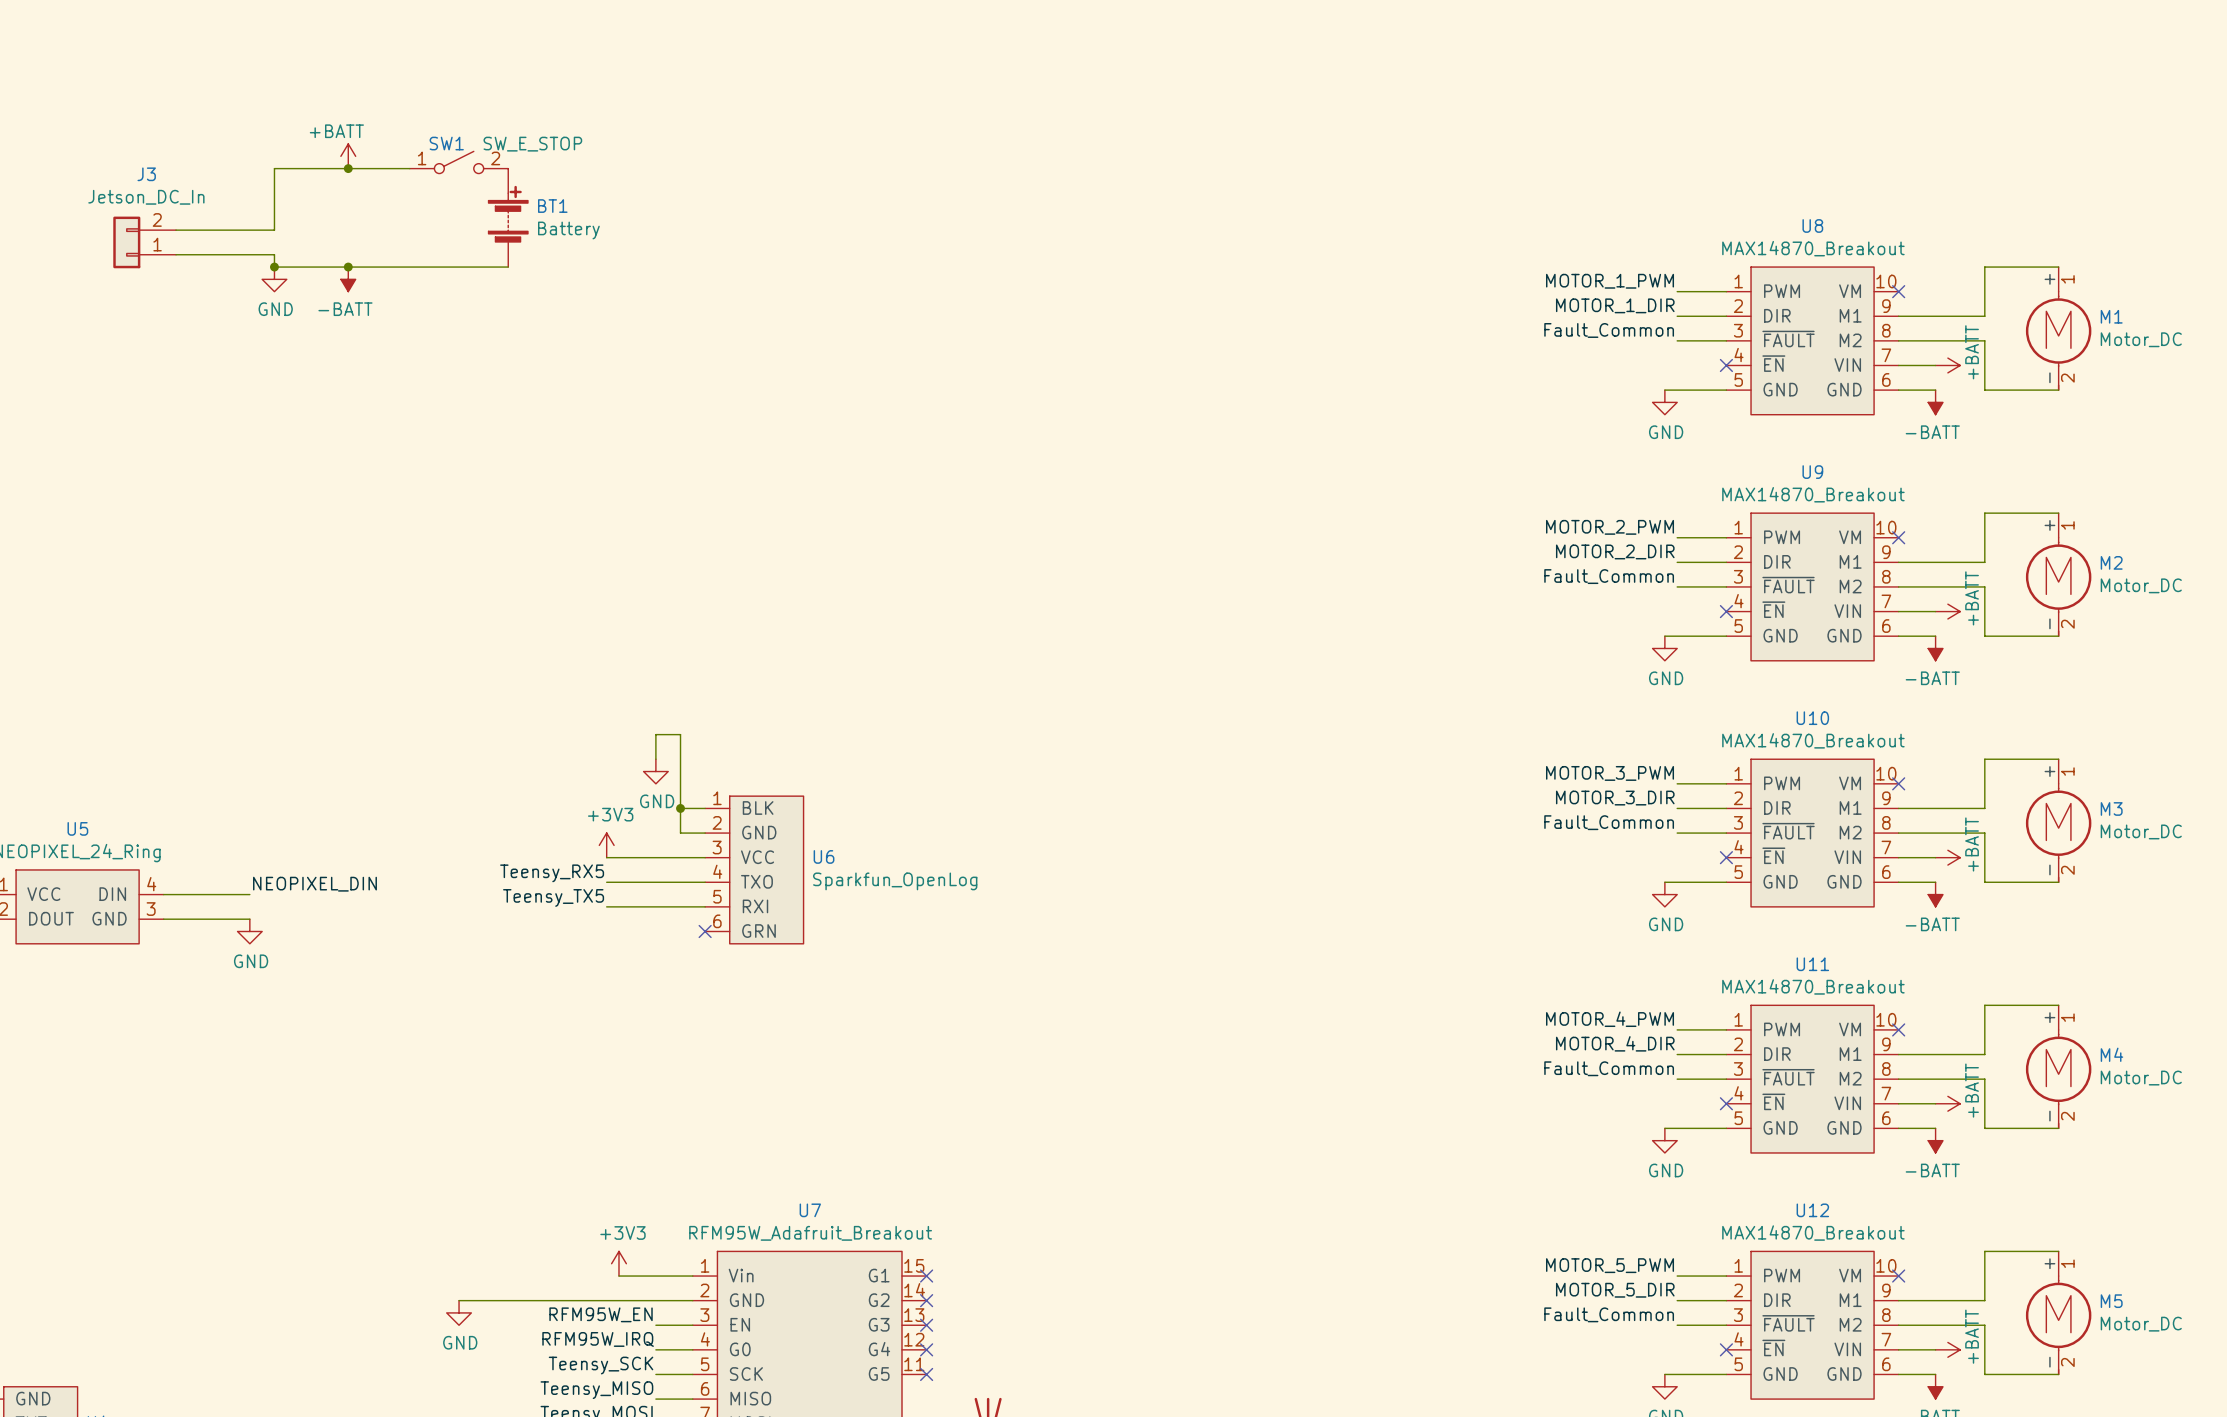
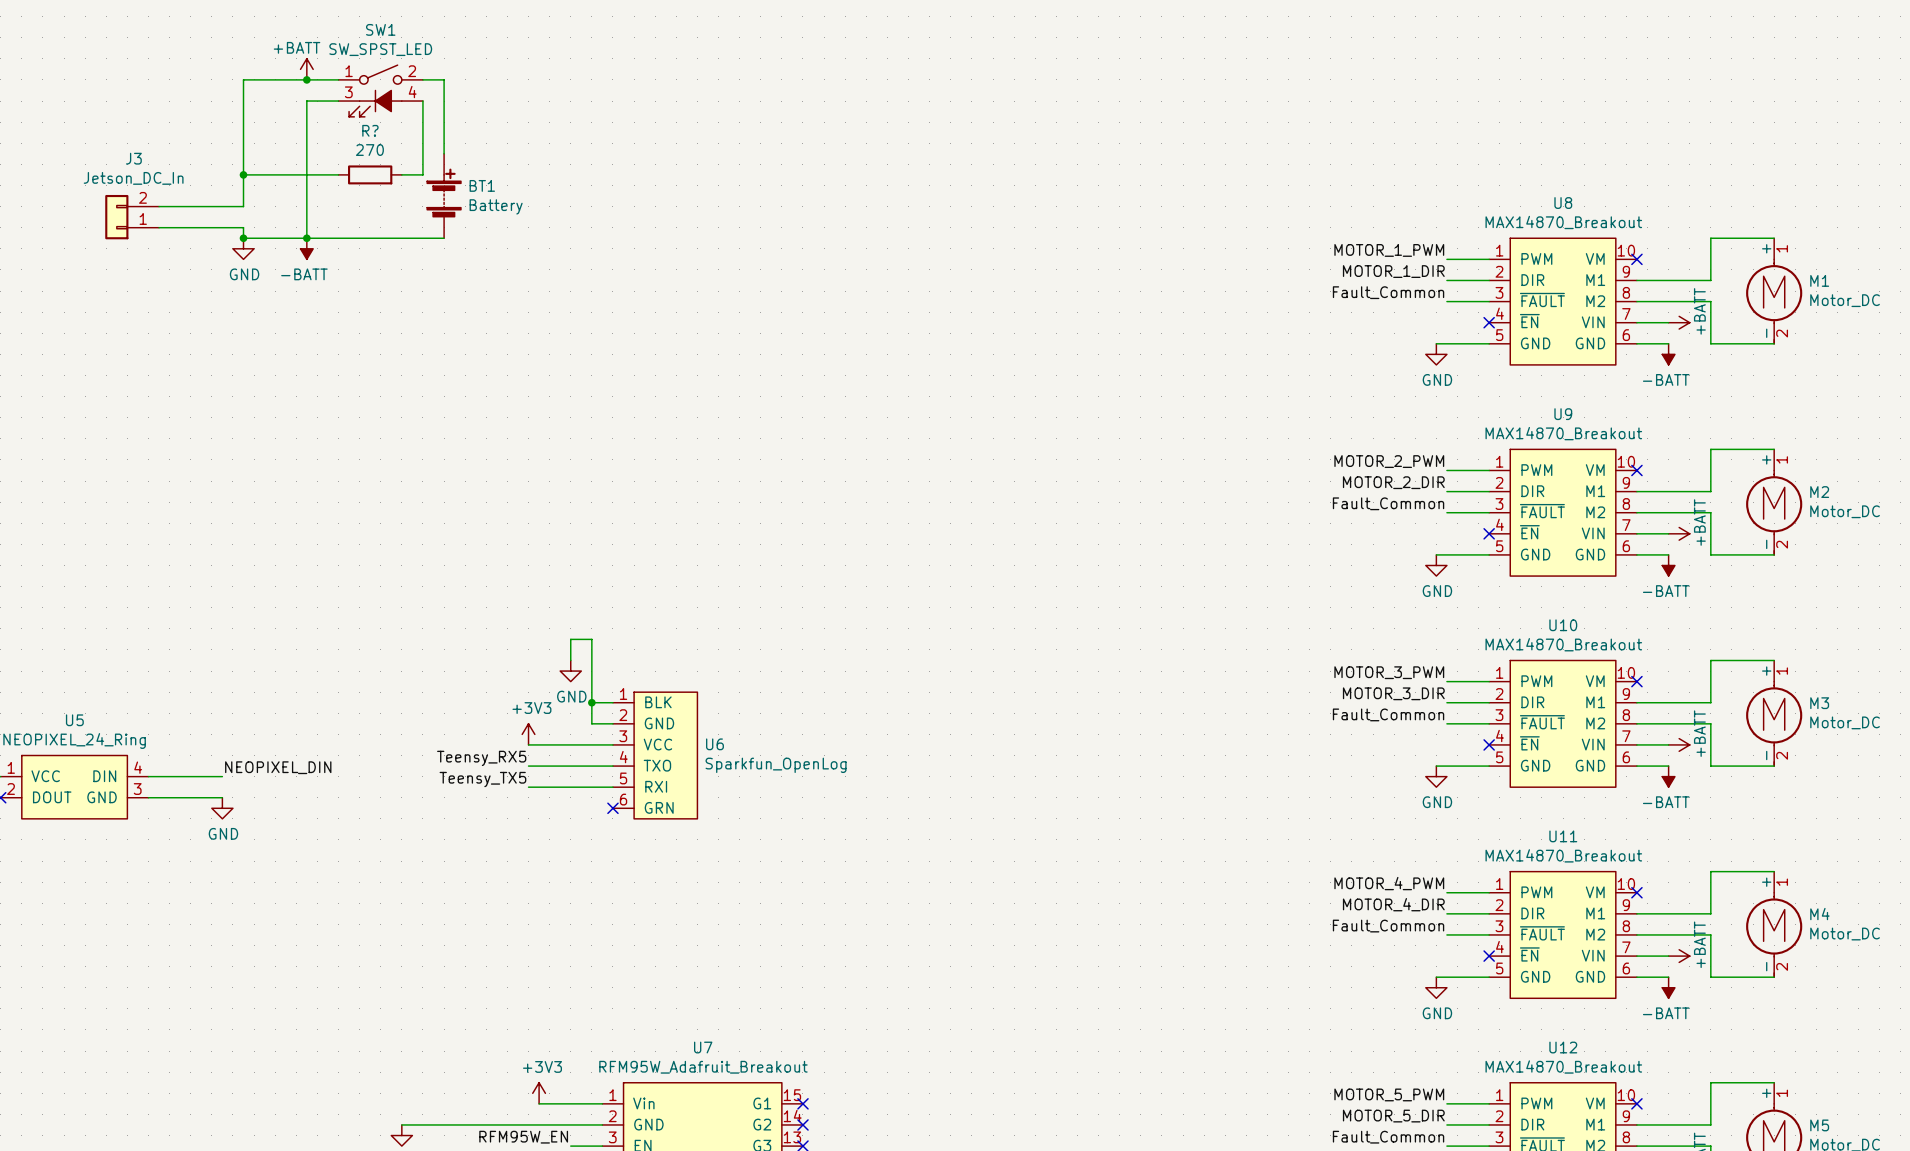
junction: none -> (306, 79)
wire: none -> (422, 79) (444, 79) (444, 153)
wire: none -> (338, 101) (306, 101) (306, 238)
wire: none -> (422, 101) (422, 174) (401, 174)
SW1 name position: SW1 (446, 143) -> SW1 (380, 29)
SW1 value: SW_E_STOP (532, 144) -> SW_SPST_LED (380, 49)
SW1 symbol: [409, 151, 509, 174] -> [338, 65, 423, 117]
power symbol position: +BATT (348, 156) -> +BATT (306, 69)
wire: (274, 168) (409, 168) -> (243, 153) (243, 79) (338, 79)
junction: (348, 168) -> none
wire: none -> (243, 174) (338, 174)
junction: none -> (243, 174)
R?: none -> 270 (370, 174)

